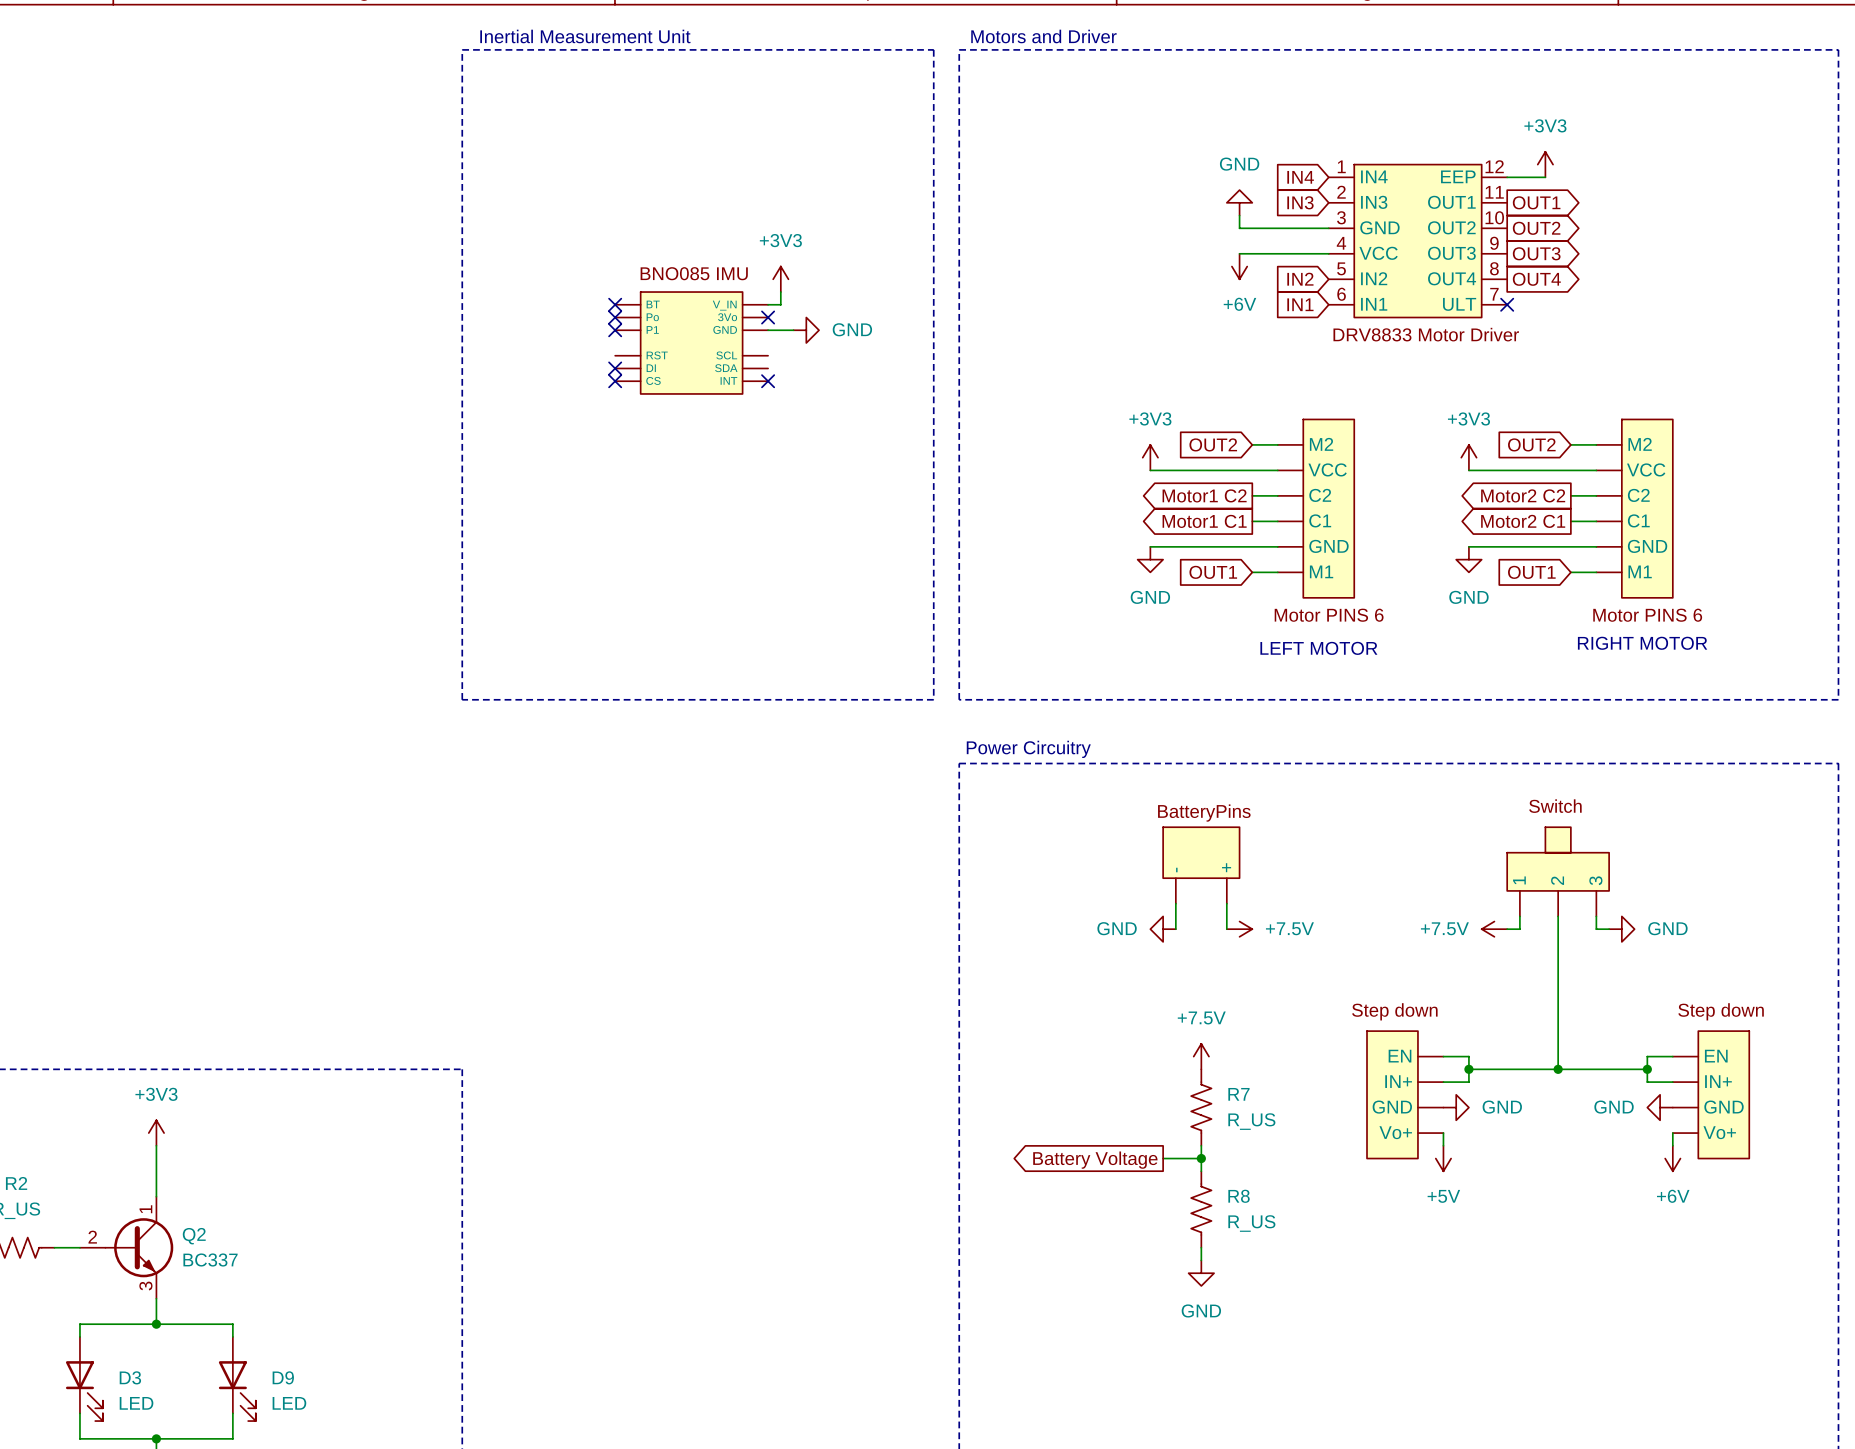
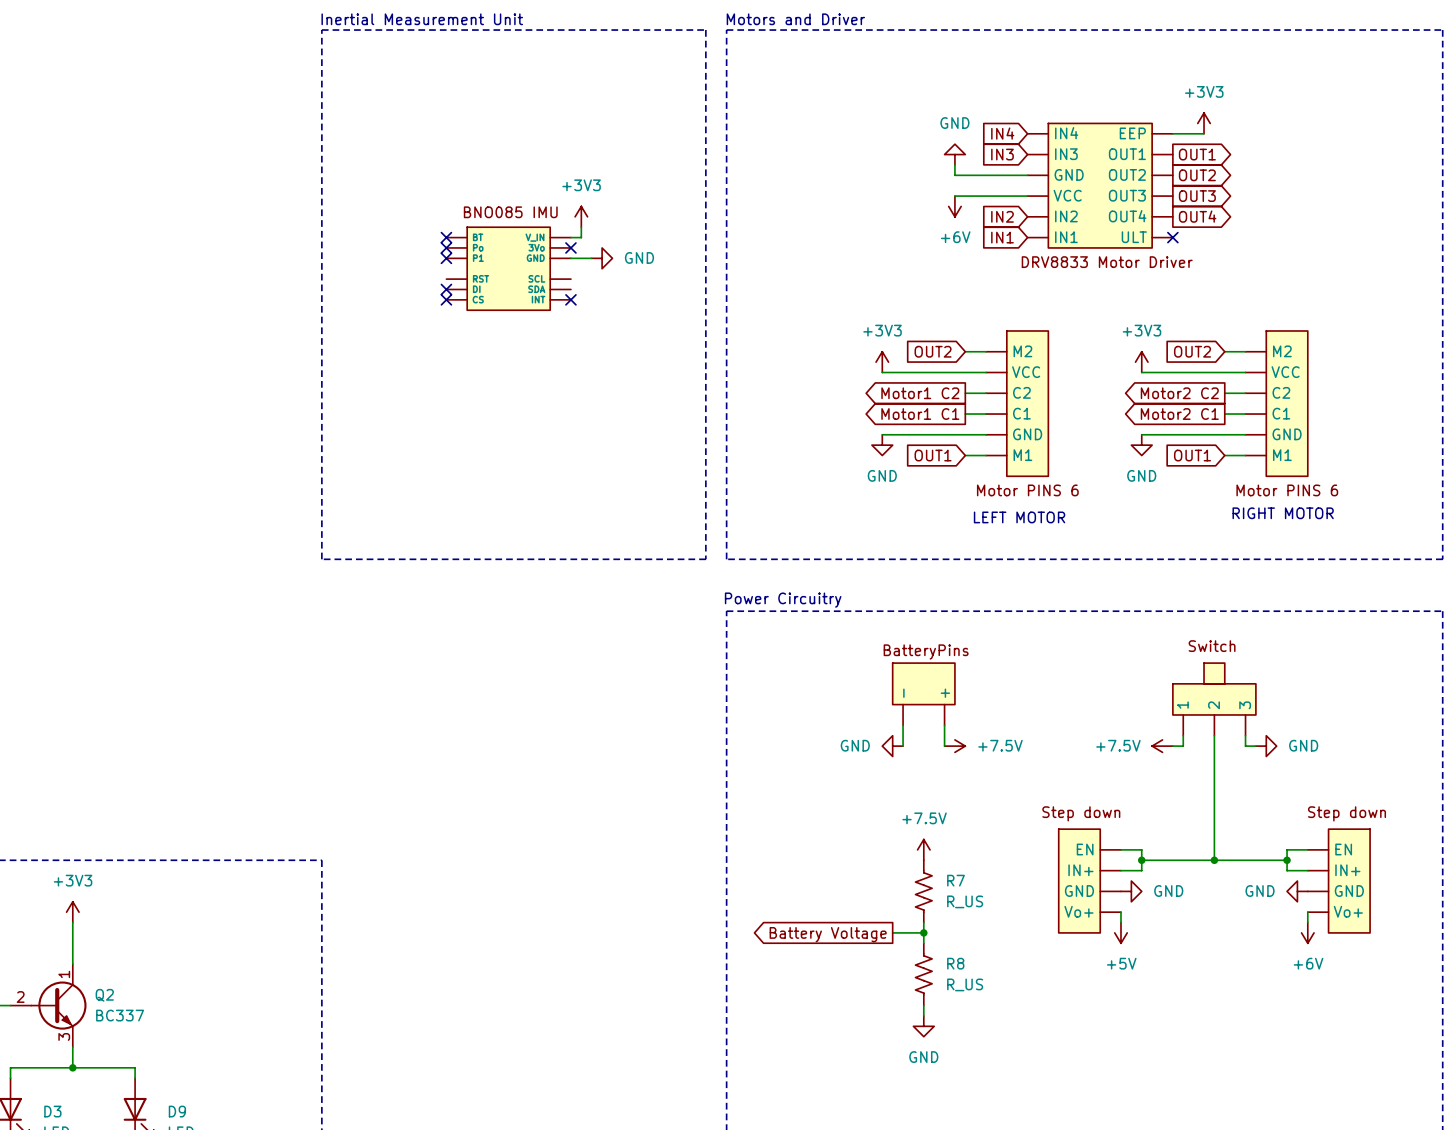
part symbol: [1328, 164, 1508, 318] -> [1027, 123, 1173, 248]

